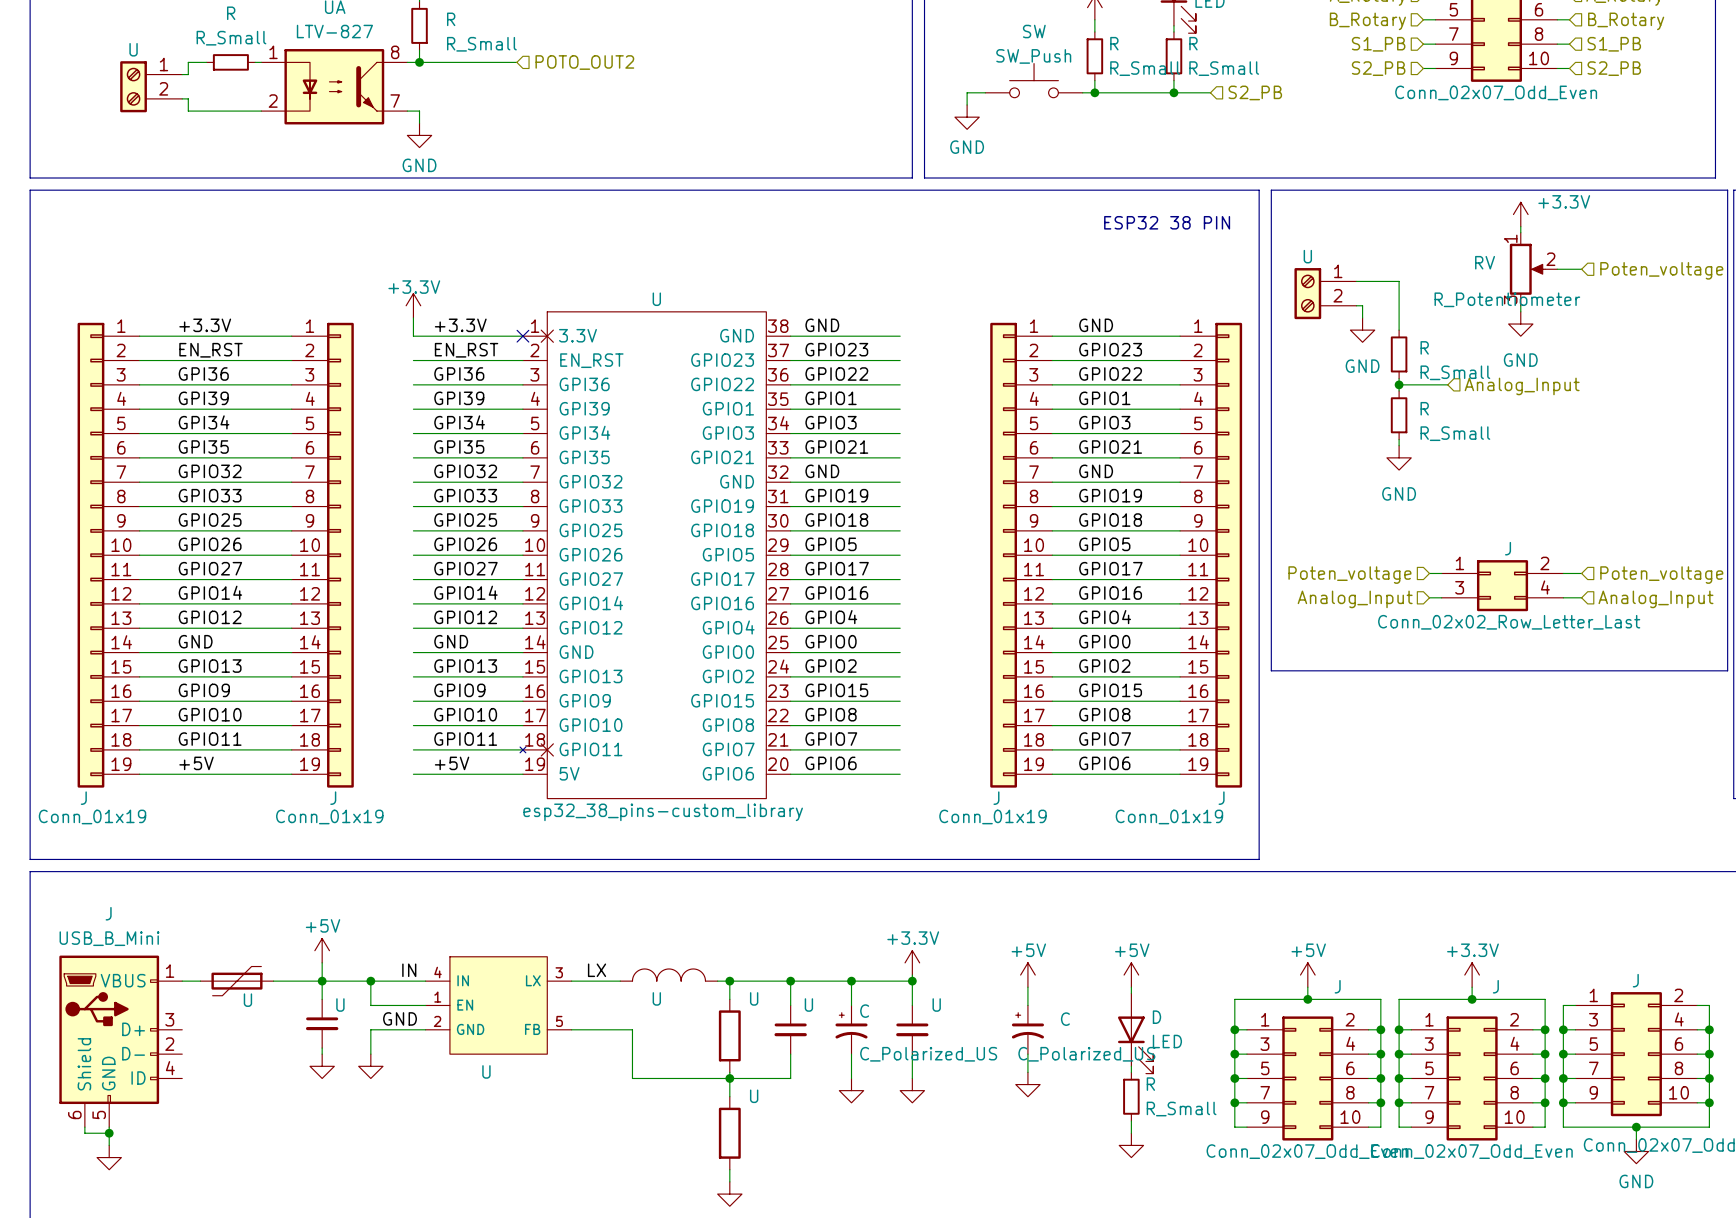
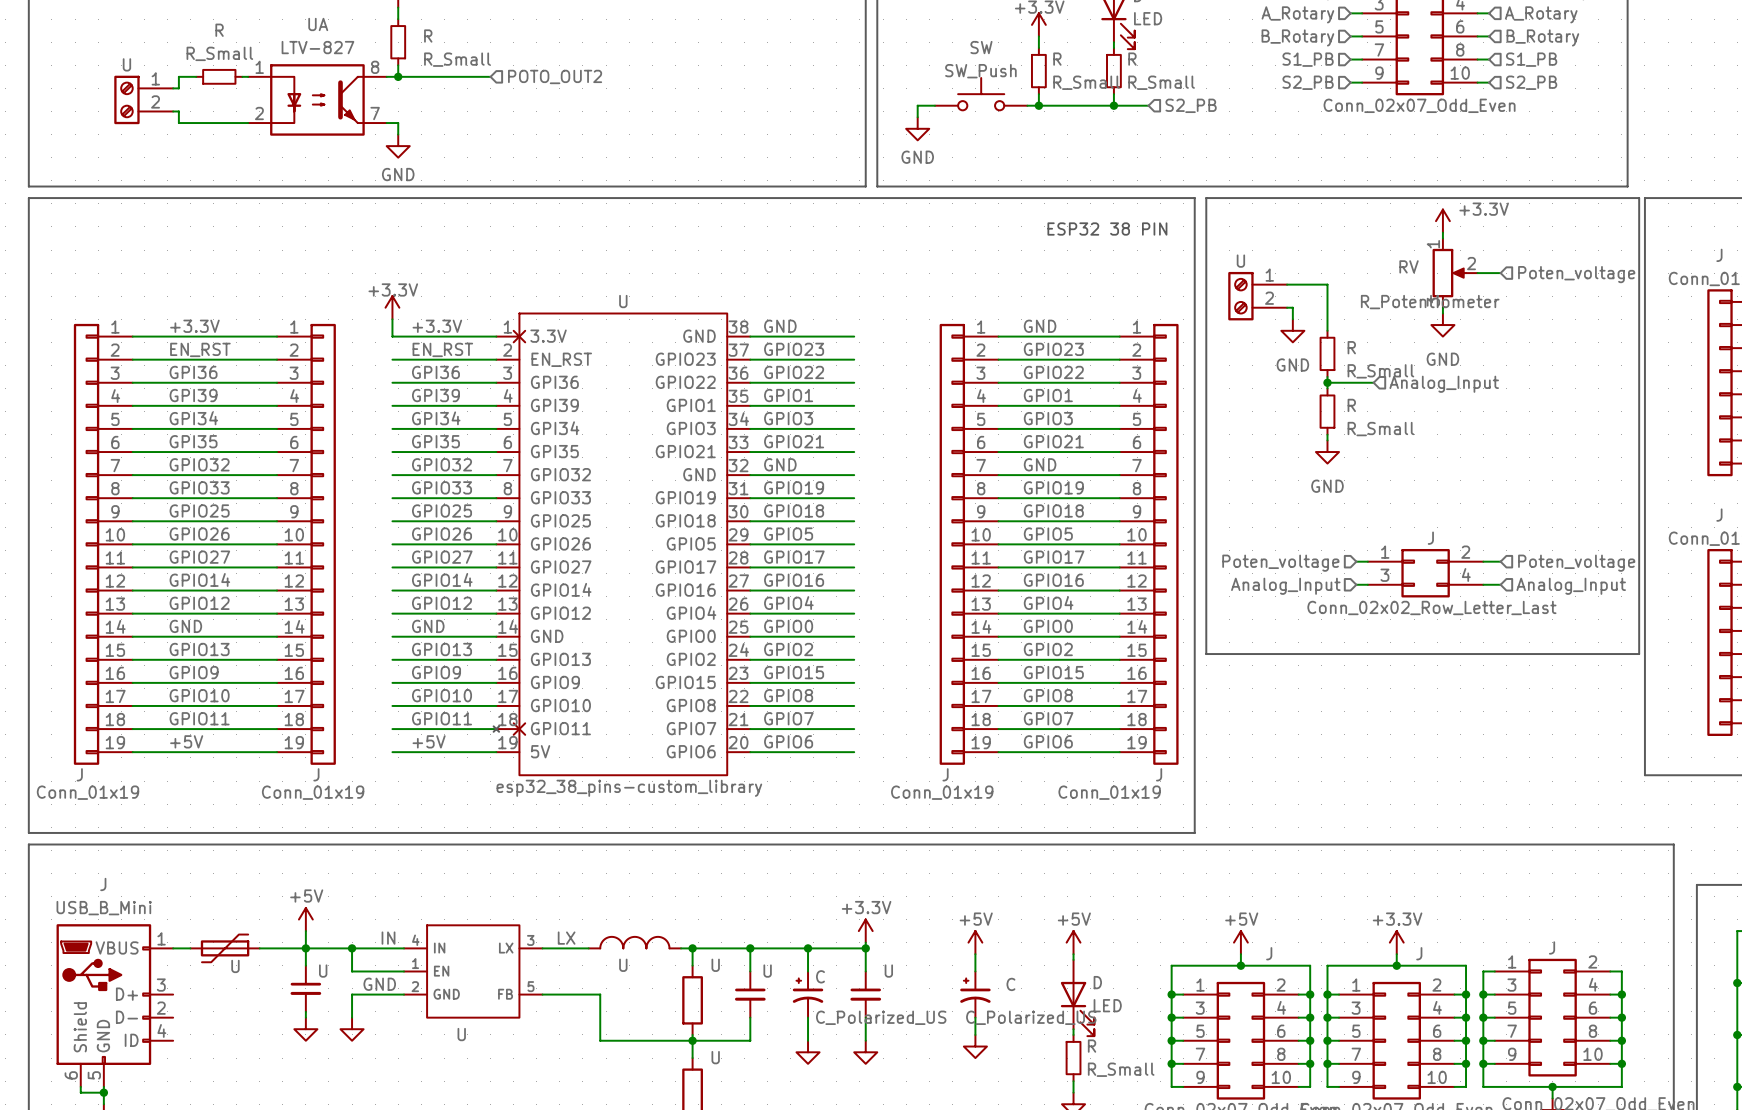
no-connect mark: (522, 336) -> none

